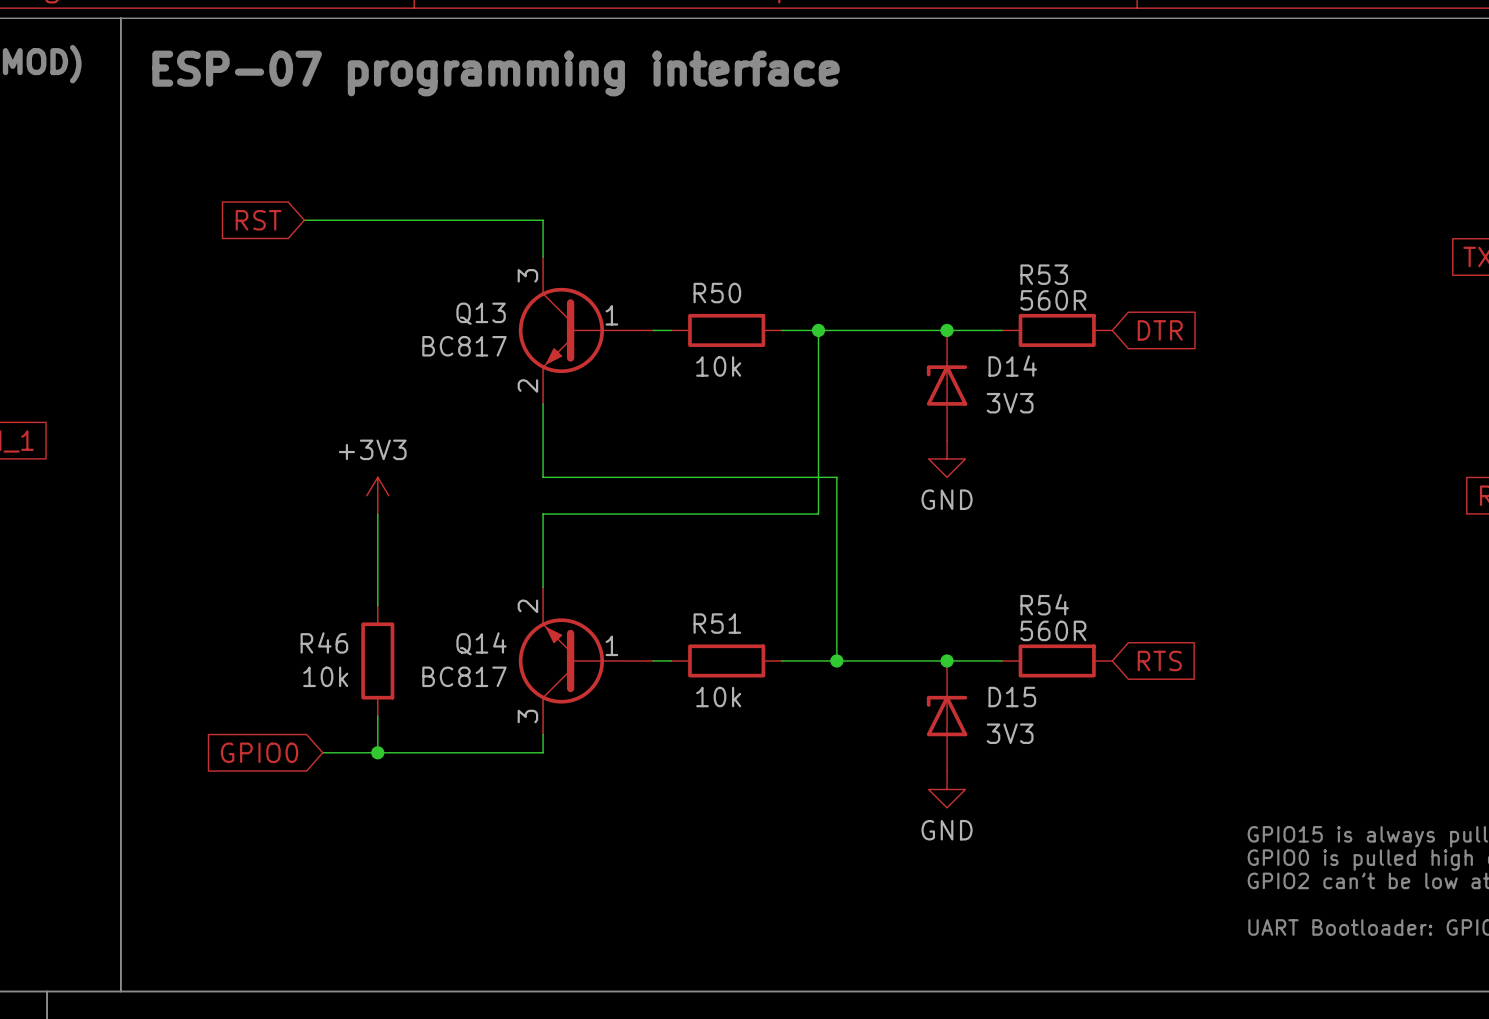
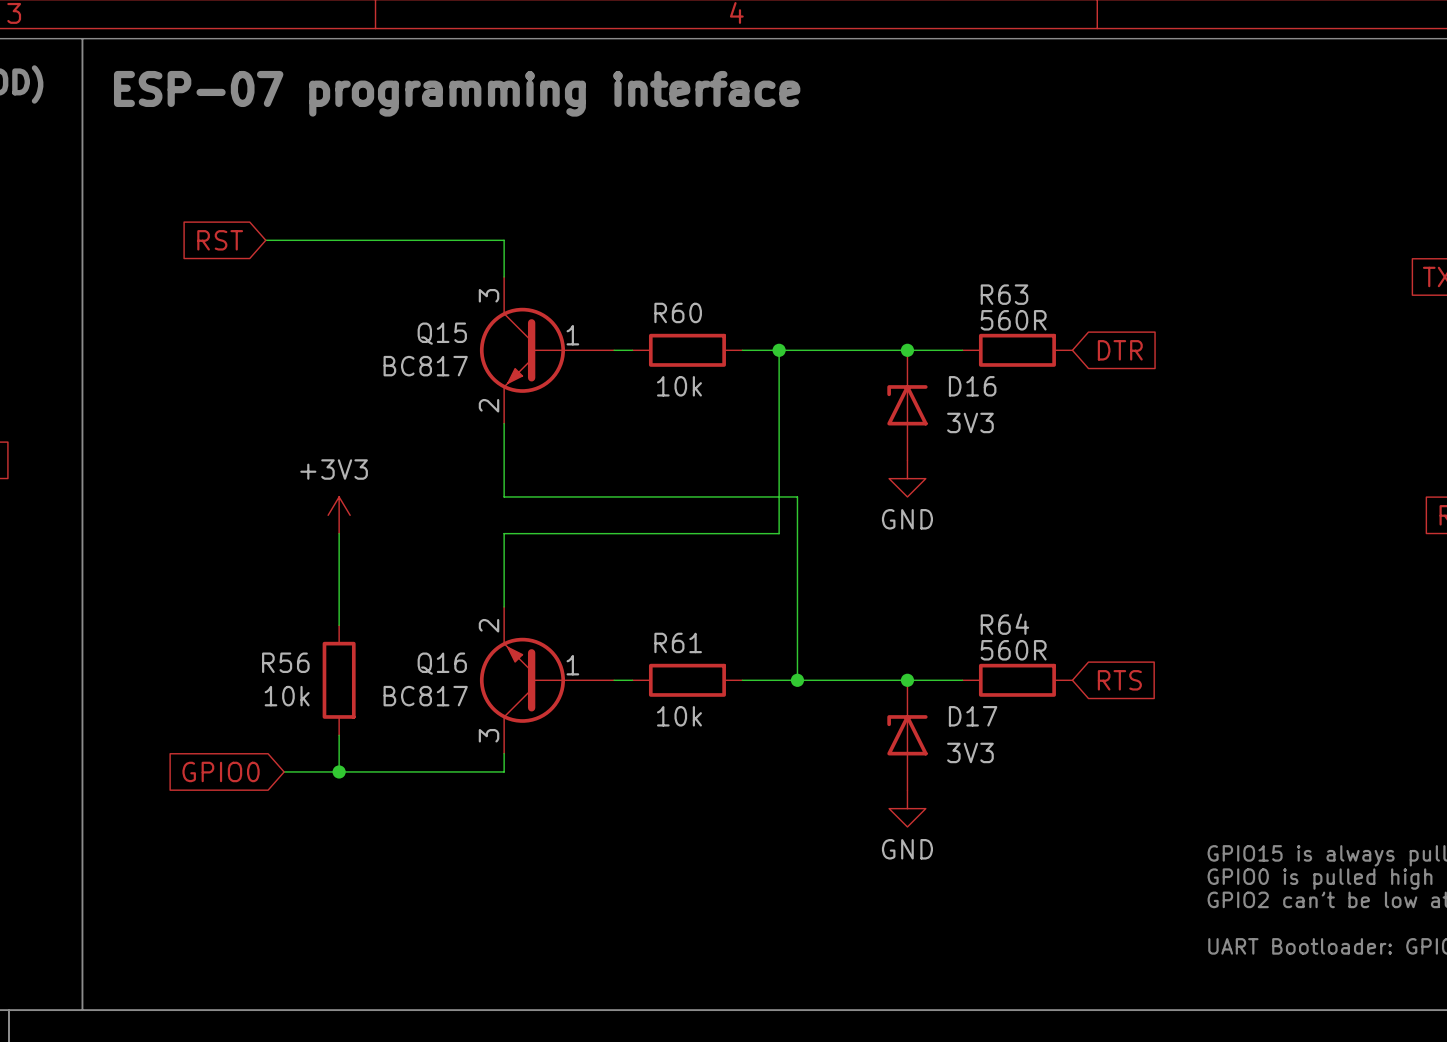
R53 name: R53 (1044, 274) -> R63 (1004, 294)
R50 name: R50 (717, 293) -> R60 (678, 312)
Q13 name: Q13 (481, 313) -> Q15 (442, 333)
D14 name: D14 (1012, 366) -> D16 (972, 386)
R54 name: R54 (1044, 604) -> R64 (1004, 624)
R51 name: R51 (717, 623) -> R61 (678, 642)
R46 name: R46 (324, 642) -> R56 (285, 662)
Q14 name: Q14 (481, 643) -> Q16 (442, 663)
D15 name: D15 (1012, 697) -> D17 (973, 716)

